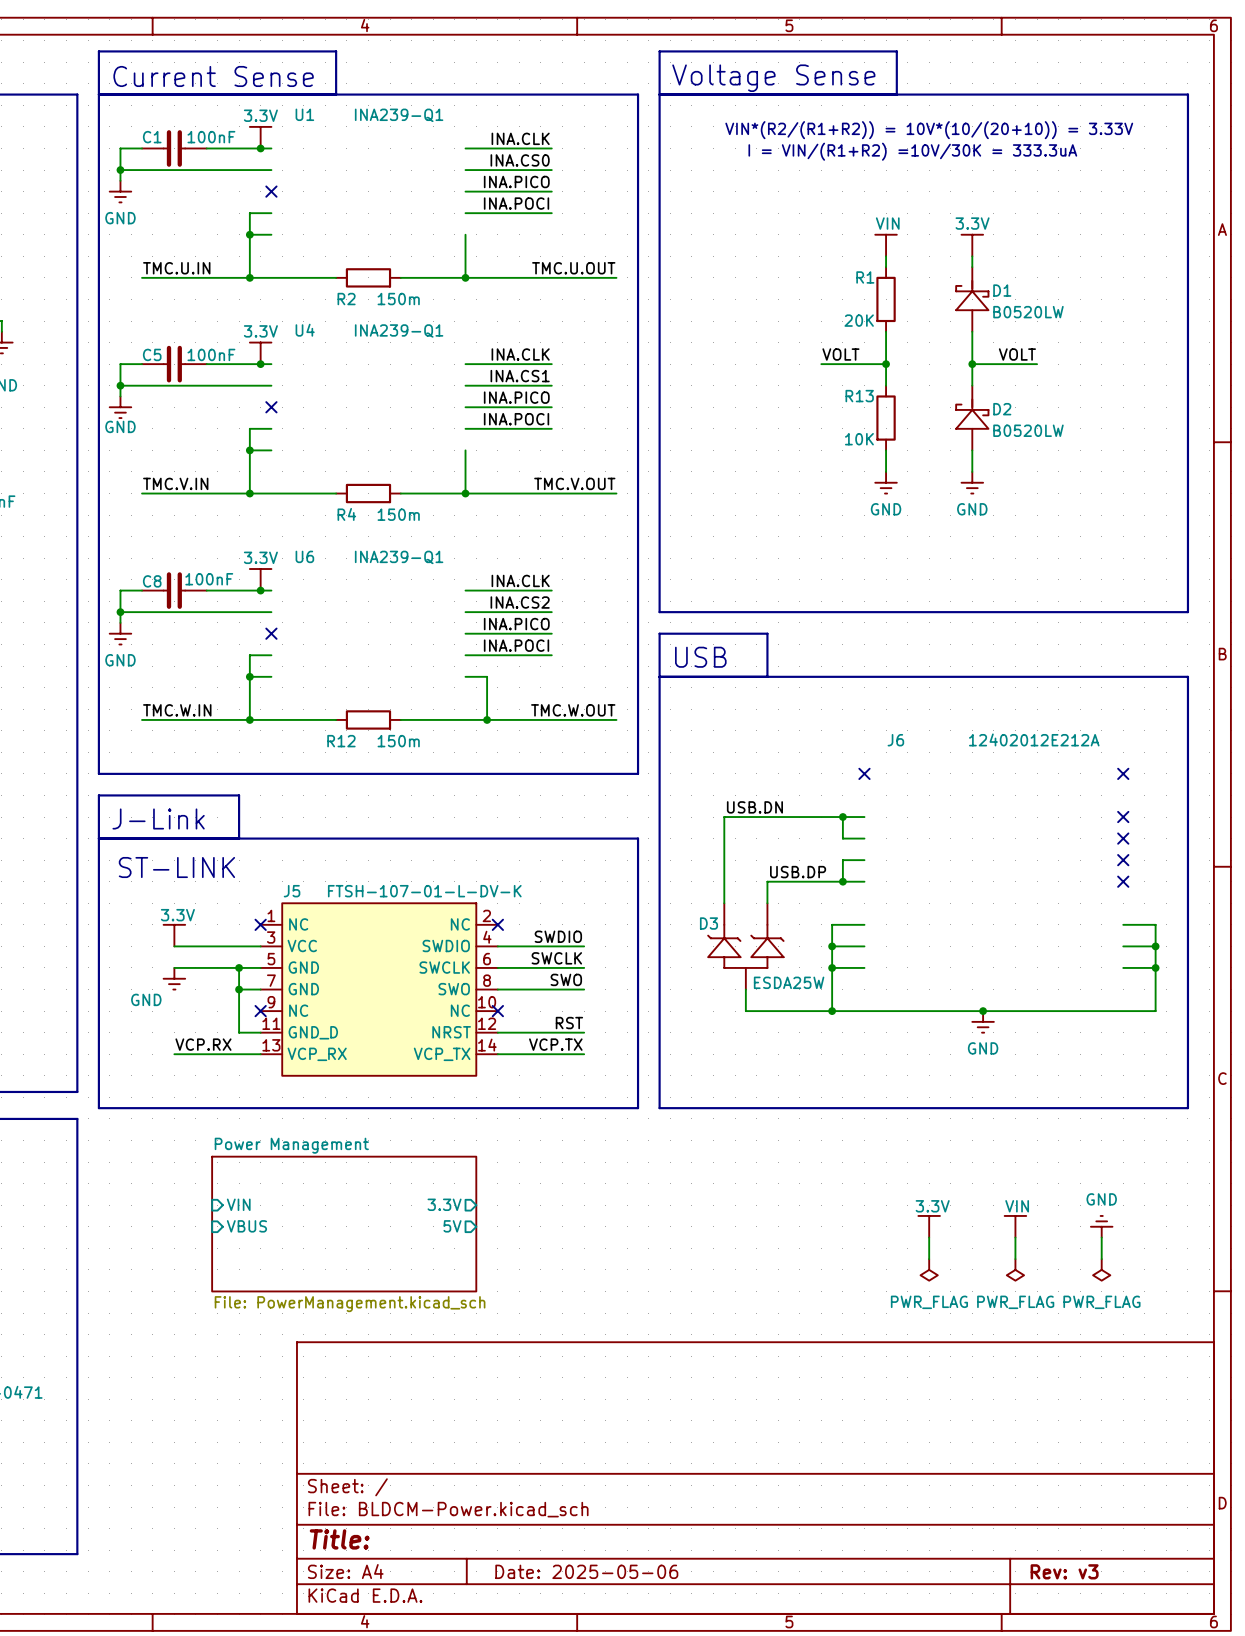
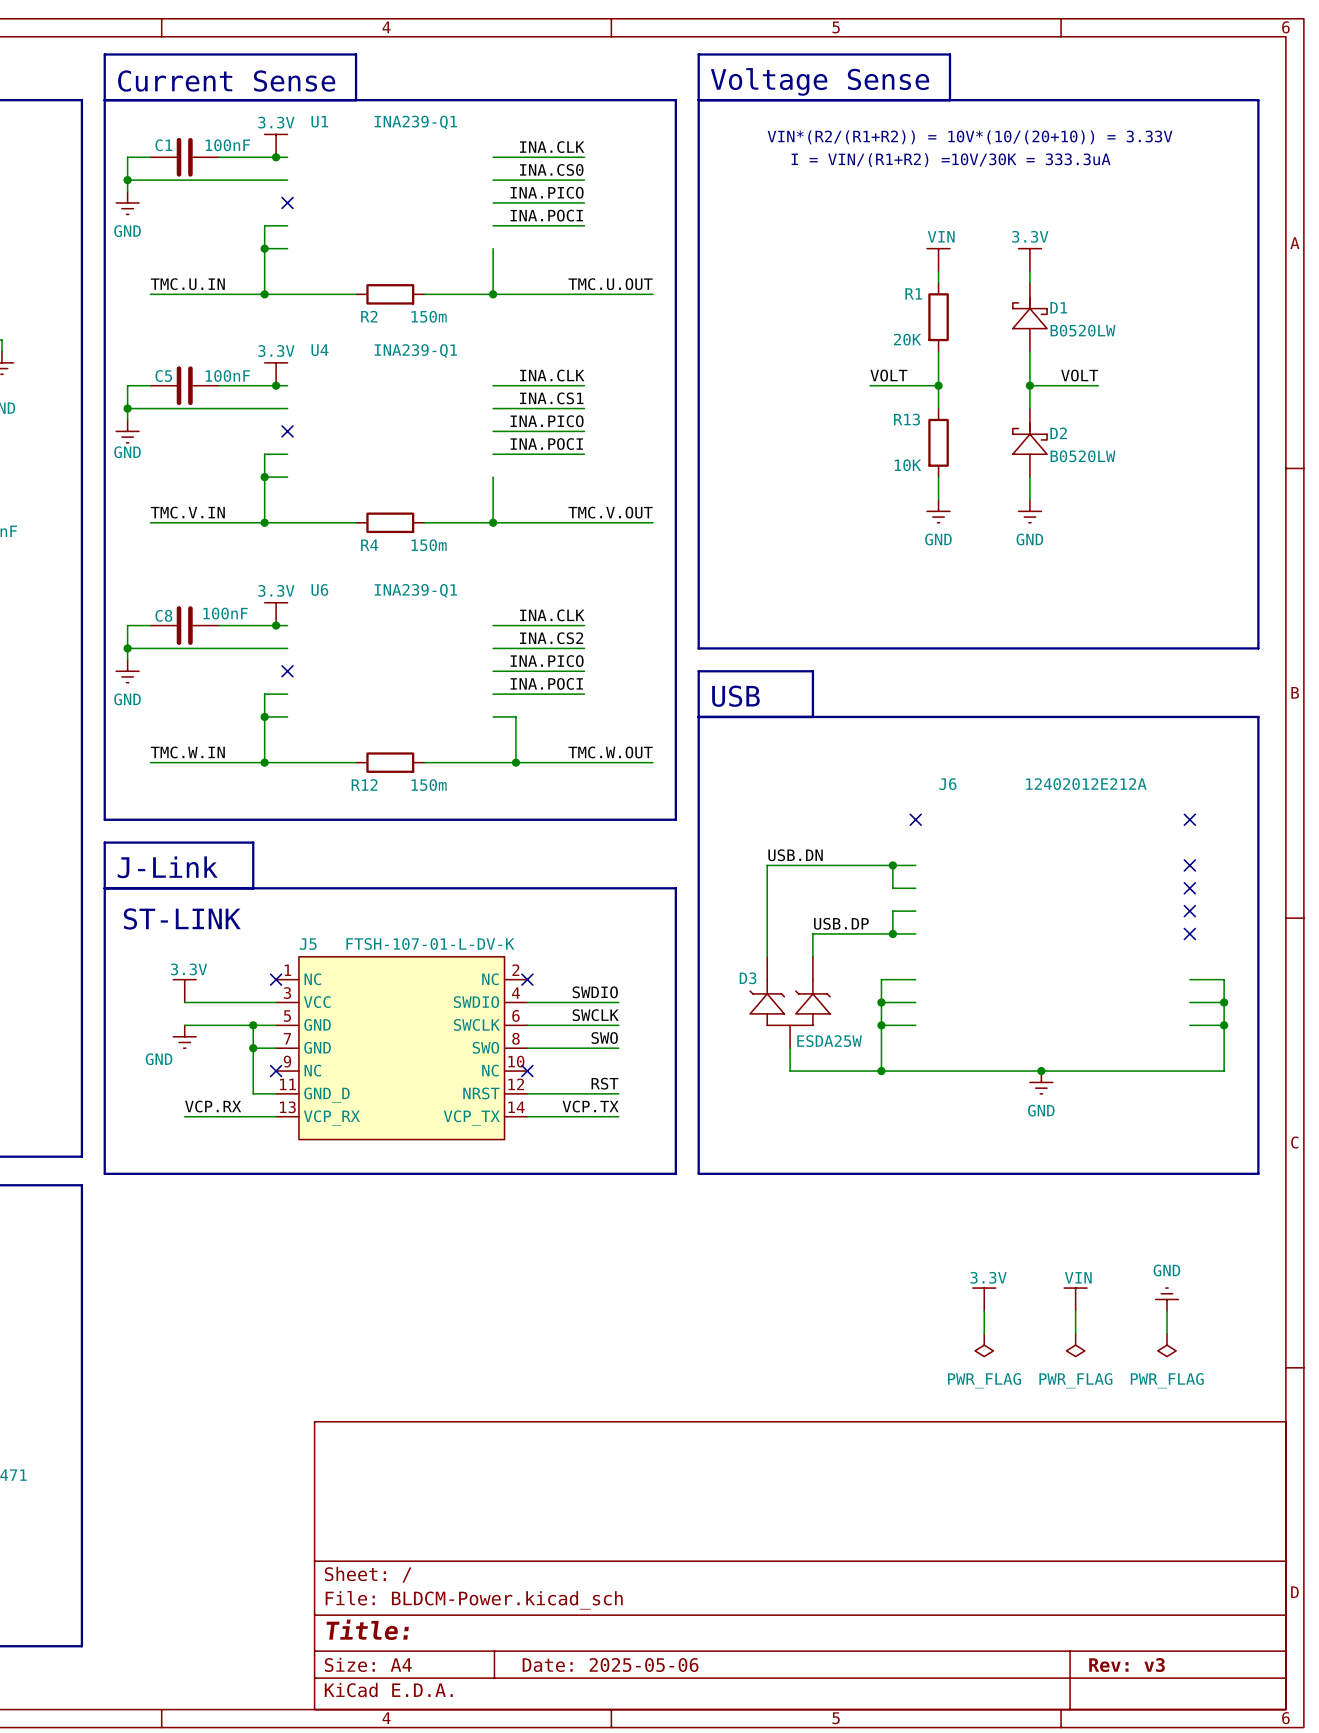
sheet pin: VIN (238, 1204) -> none
sheet pin: 3.3V (444, 1204) -> none
sheet Power Management: File: PowerManagement.kicad_sch (344, 1224) -> none
sheet pin: VBUS (246, 1226) -> none
sheet pin: 5V (452, 1226) -> none

